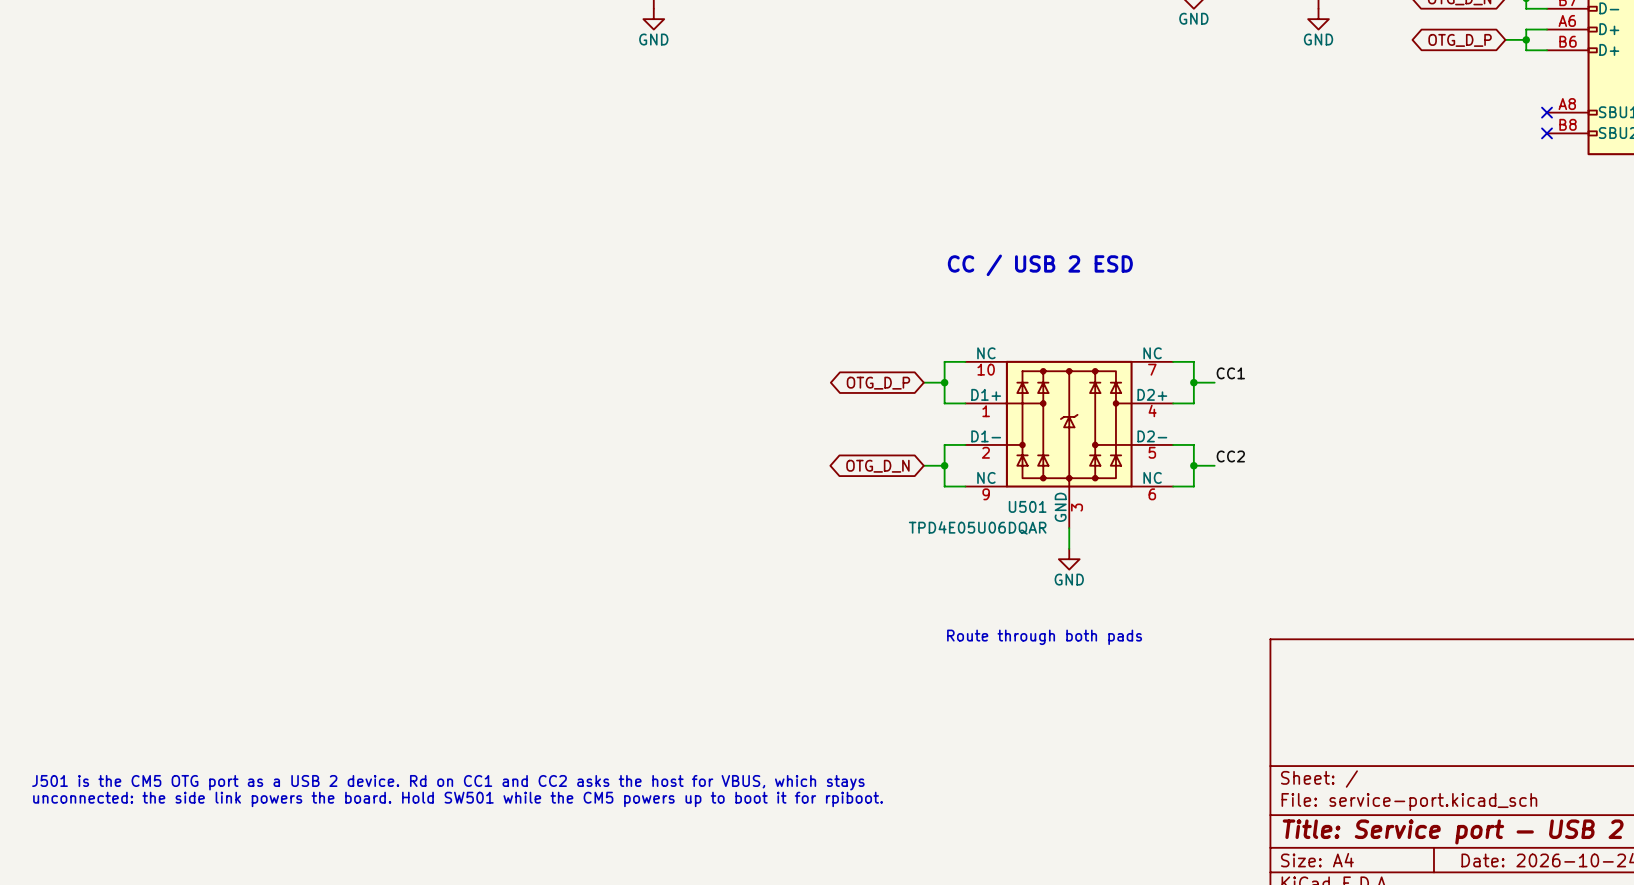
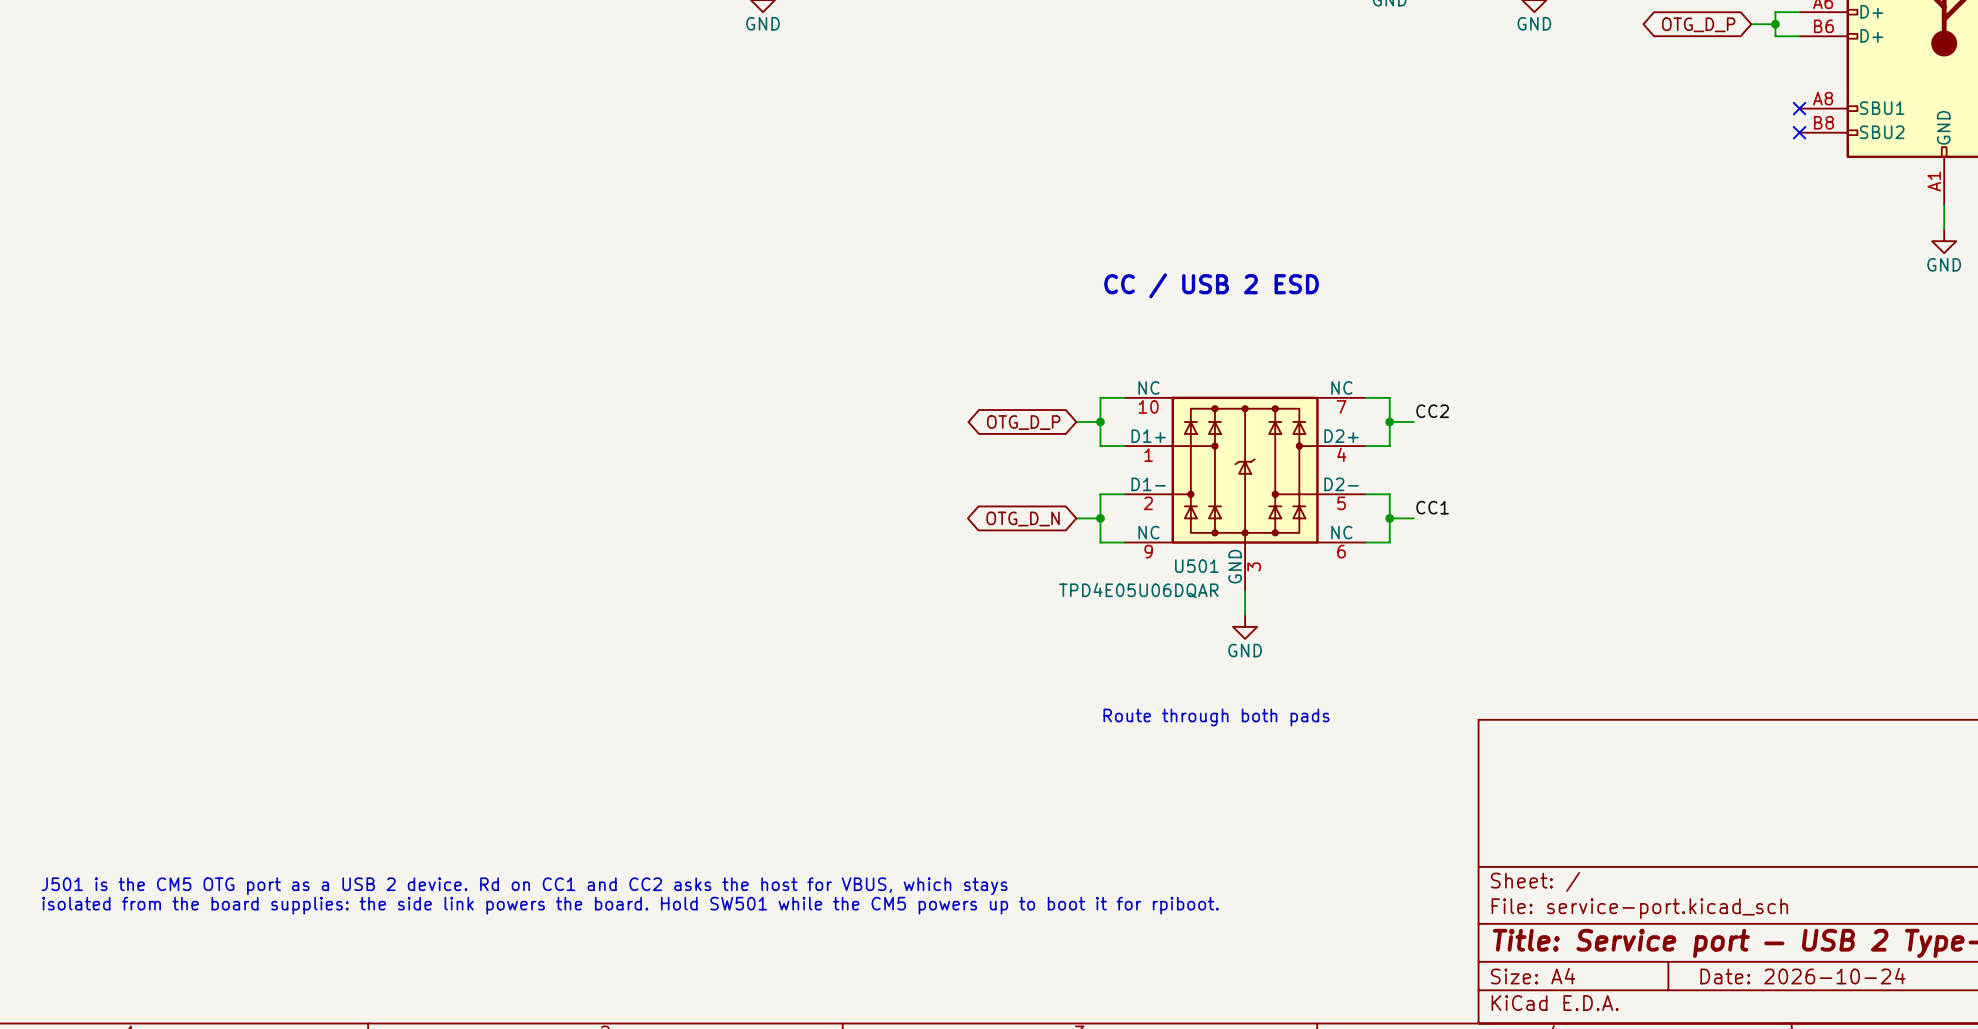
label: CC1 (1230, 373) -> CC2 (1432, 411)
label: CC2 (1230, 456) -> CC1 (1432, 507)
text: unconnected: the side link powers the board. Hold SW501 while the CM5 powers up to boot it for rpiboot. (458, 799) -> isolated from the board supplies: the side link powers the board. Hold SW501 while the CM5 powers up to boot it for rpiboot. (630, 905)

